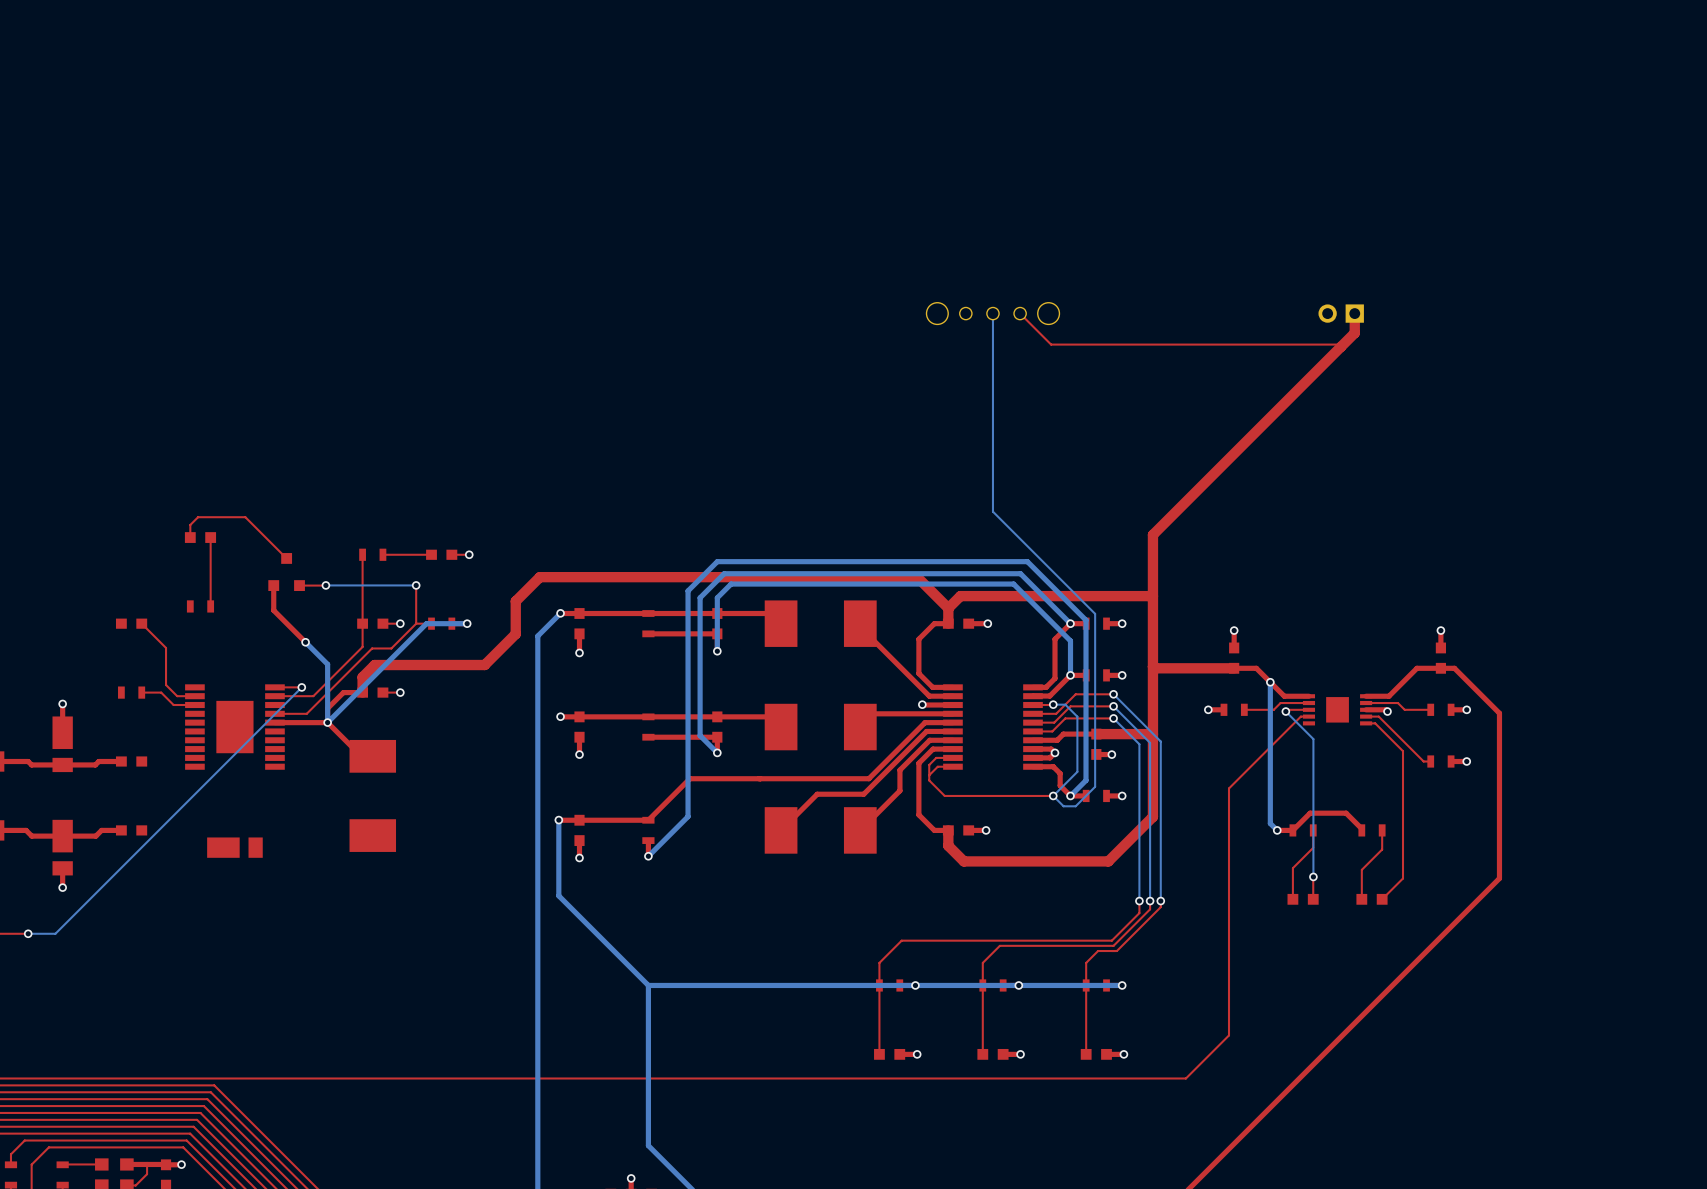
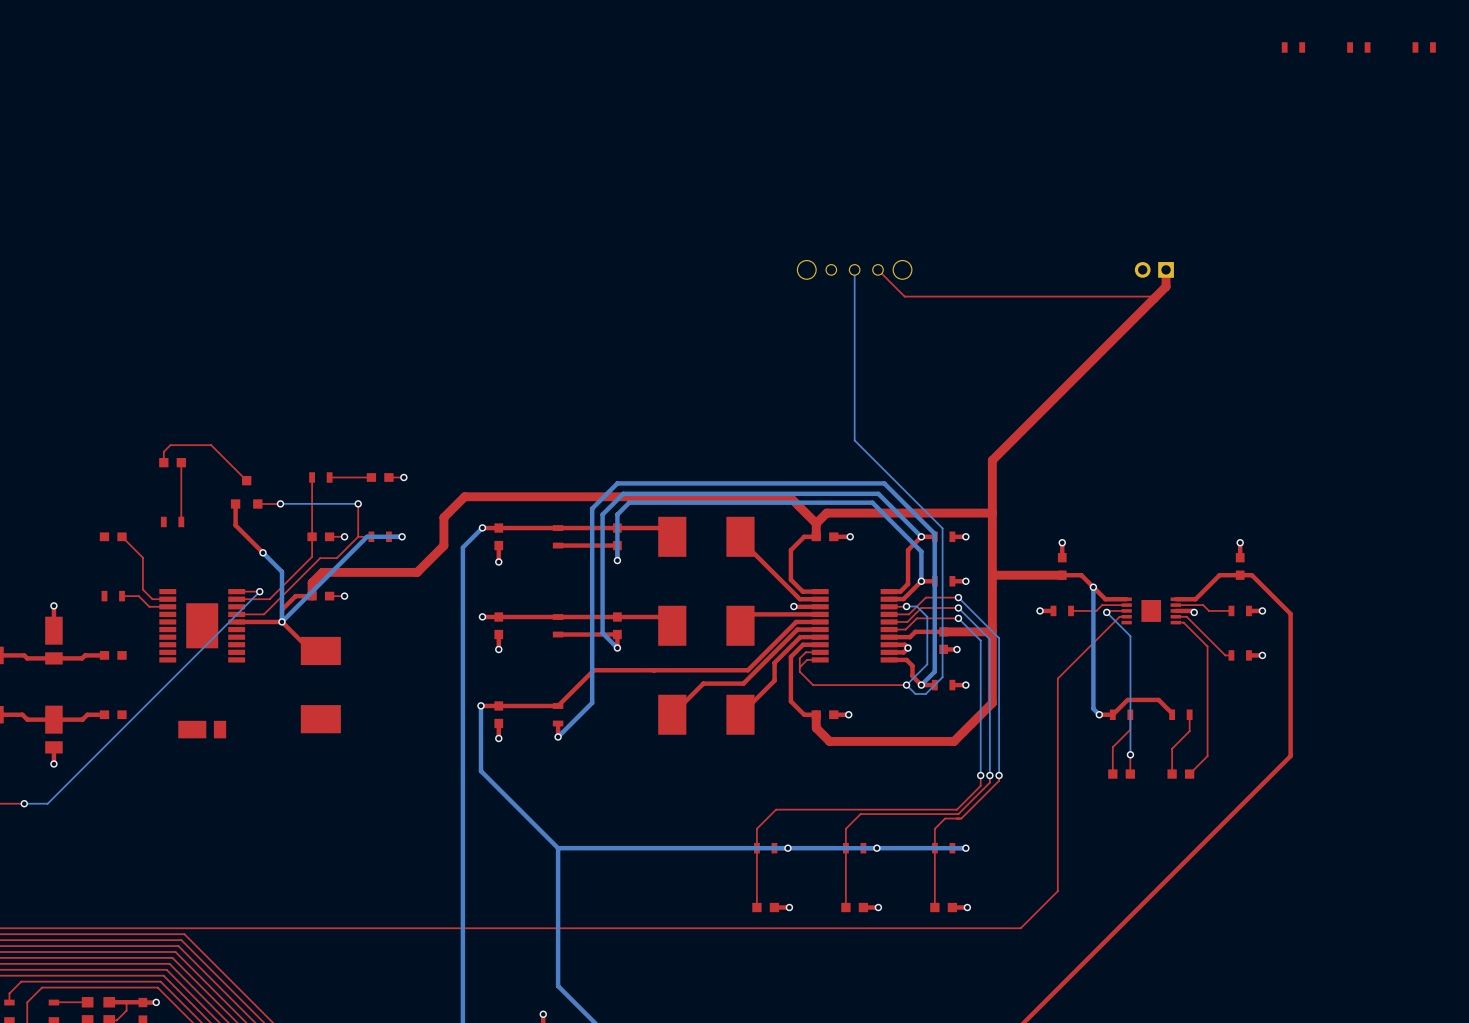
part: none -> (1293, 47)
part: none -> (1358, 47)
part: none -> (1424, 47)

